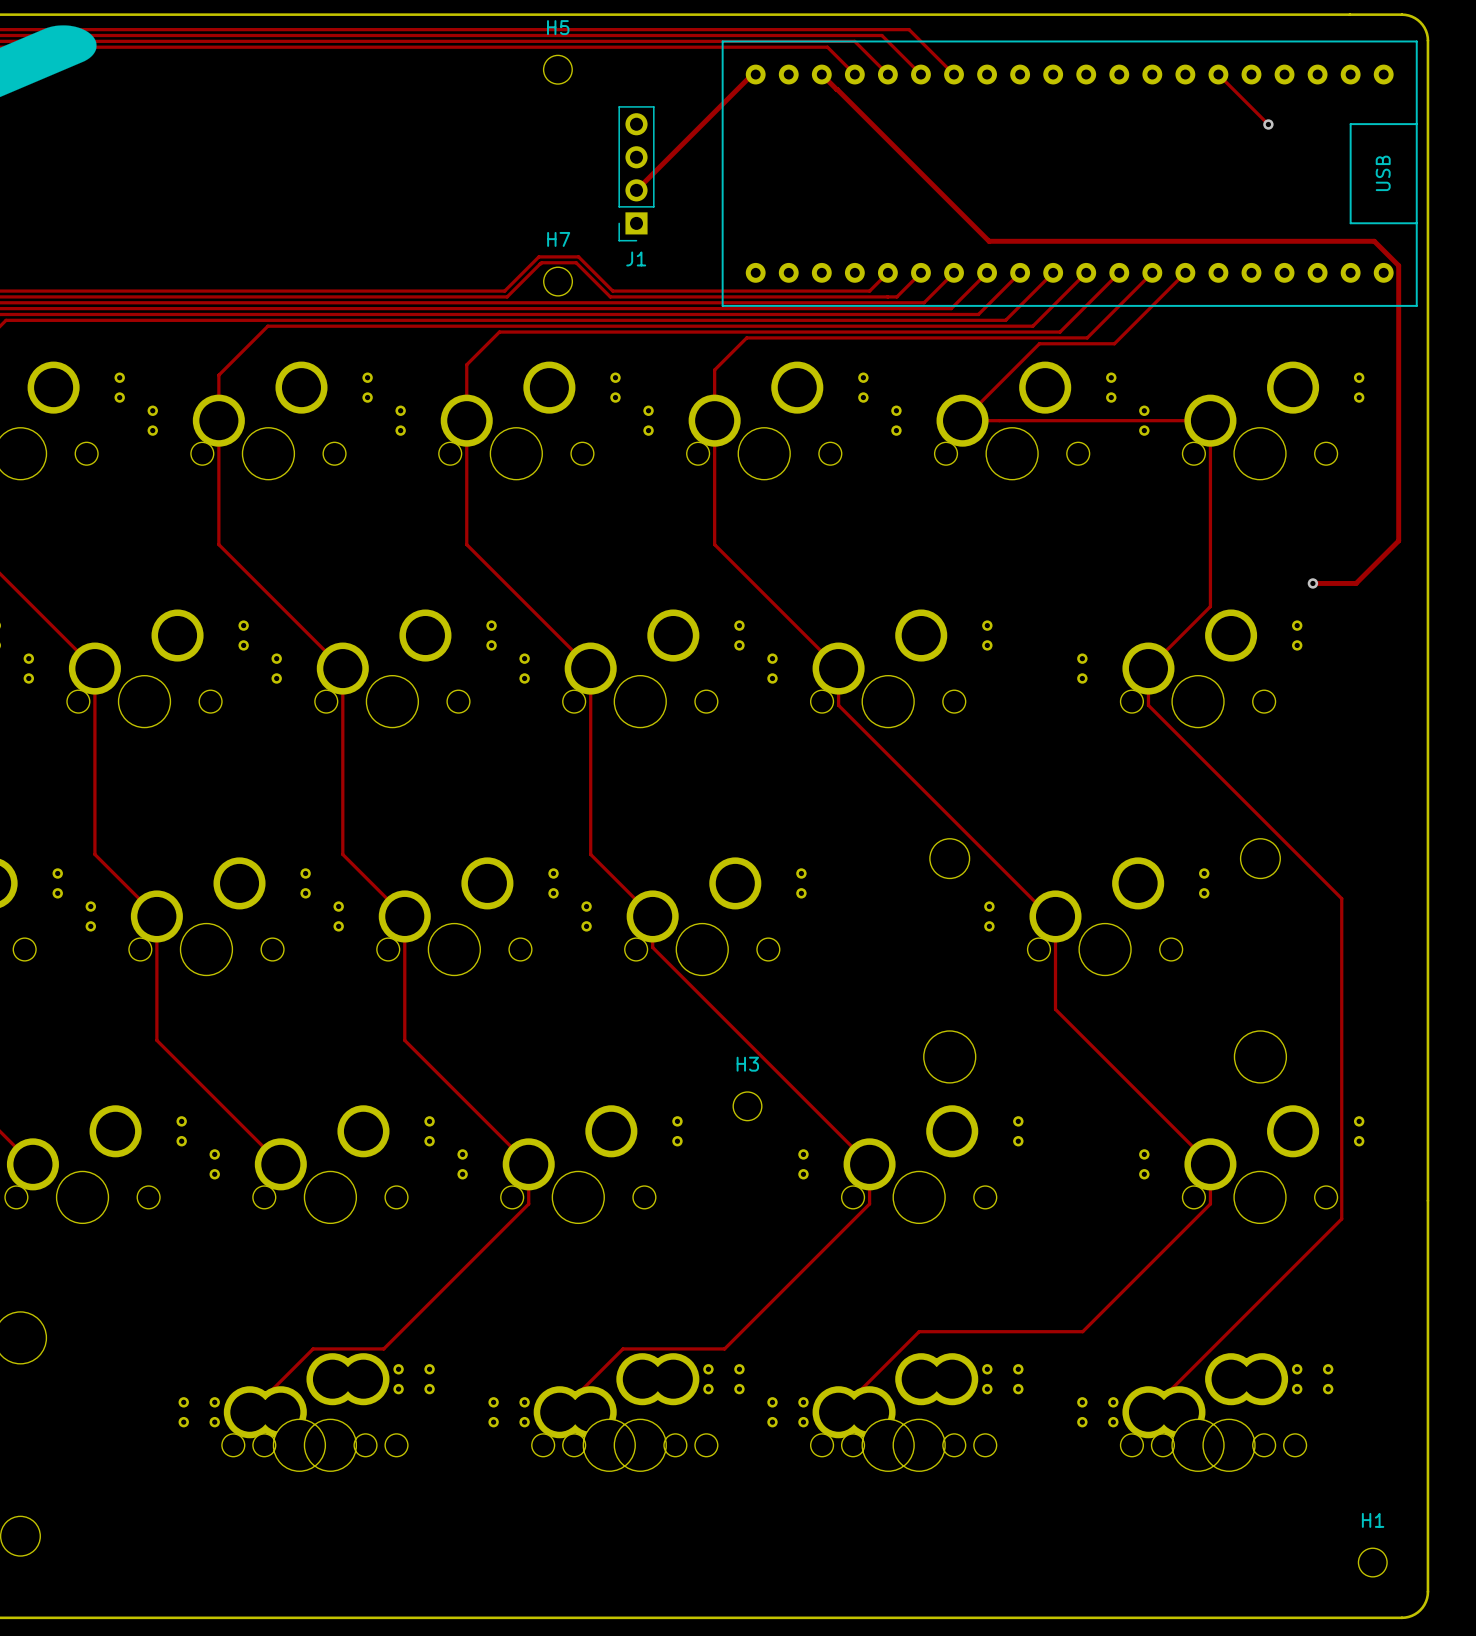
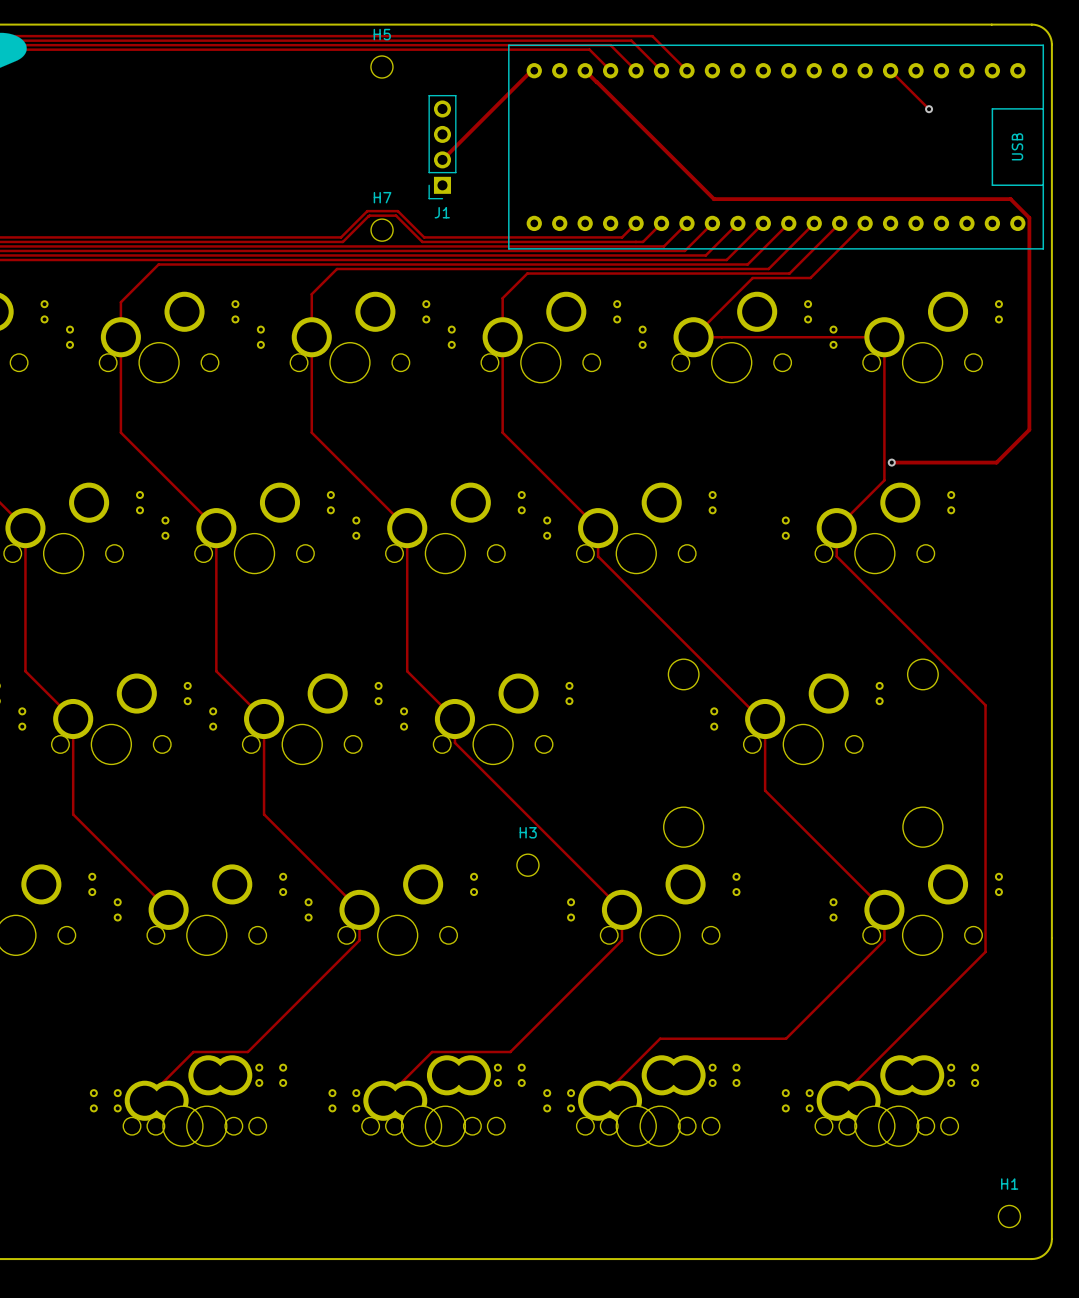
track: none -> (891, 462) (963, 462)
via: none -> (891, 462)
via: (1312, 583) -> none

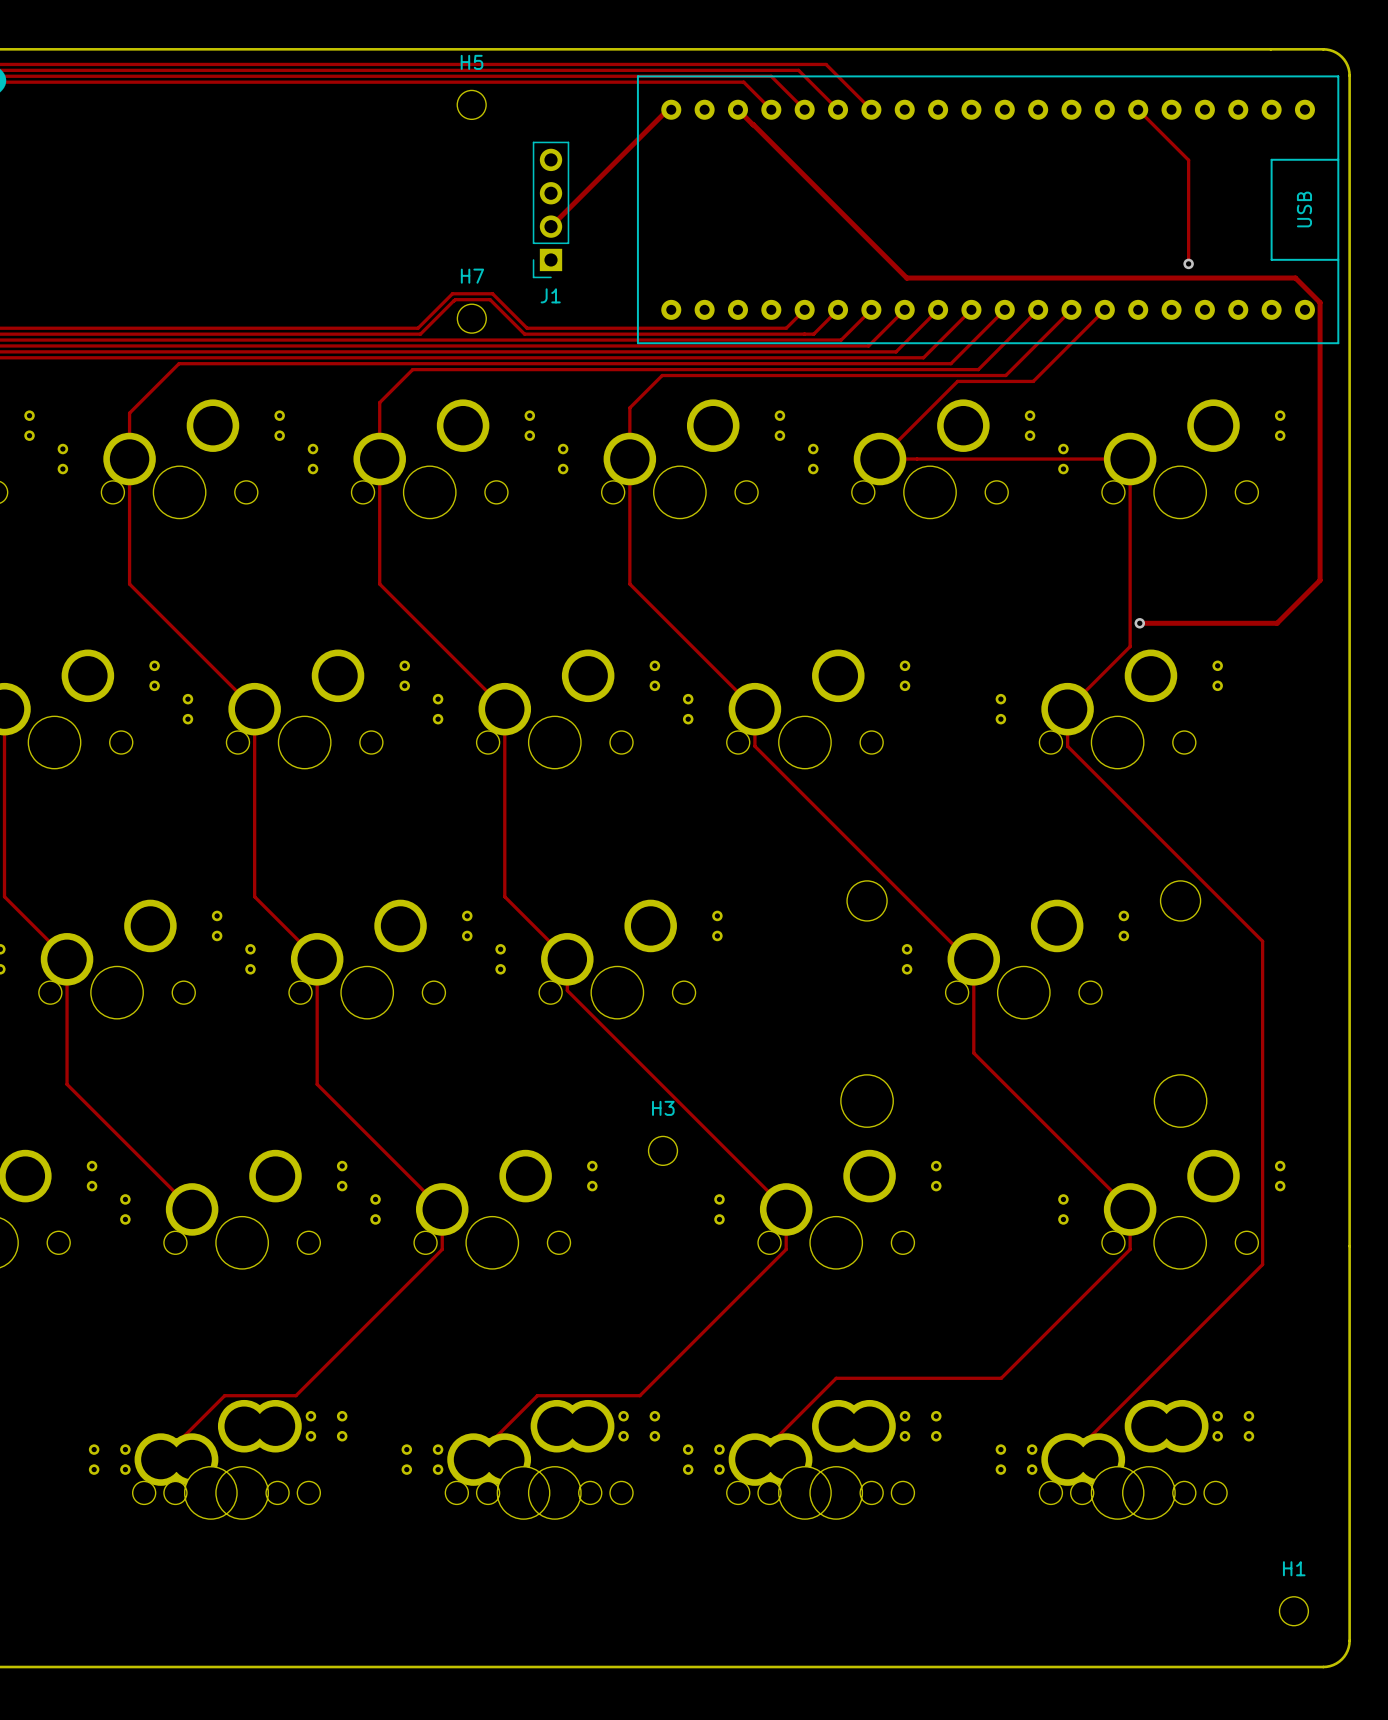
track: none -> (1188, 160) (1188, 263)
via: (929, 109) -> none
via: none -> (1188, 263)

